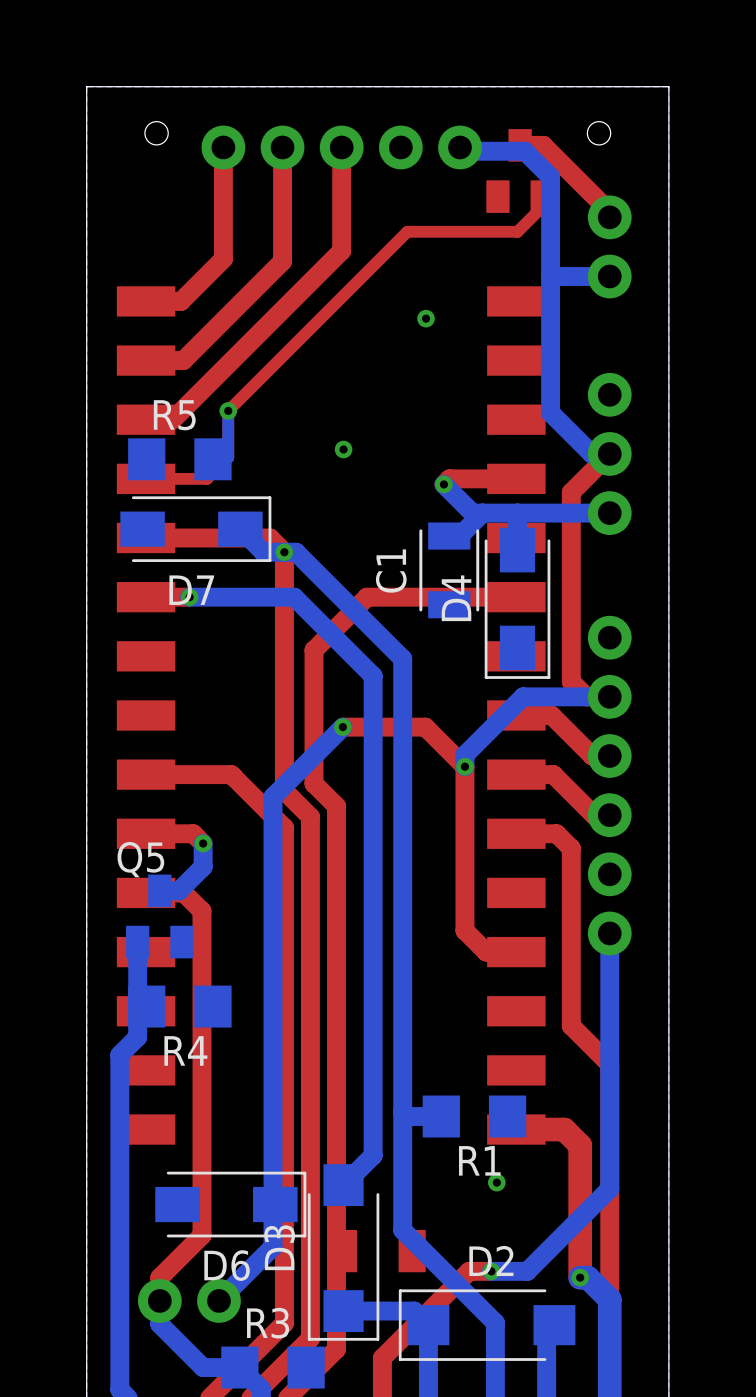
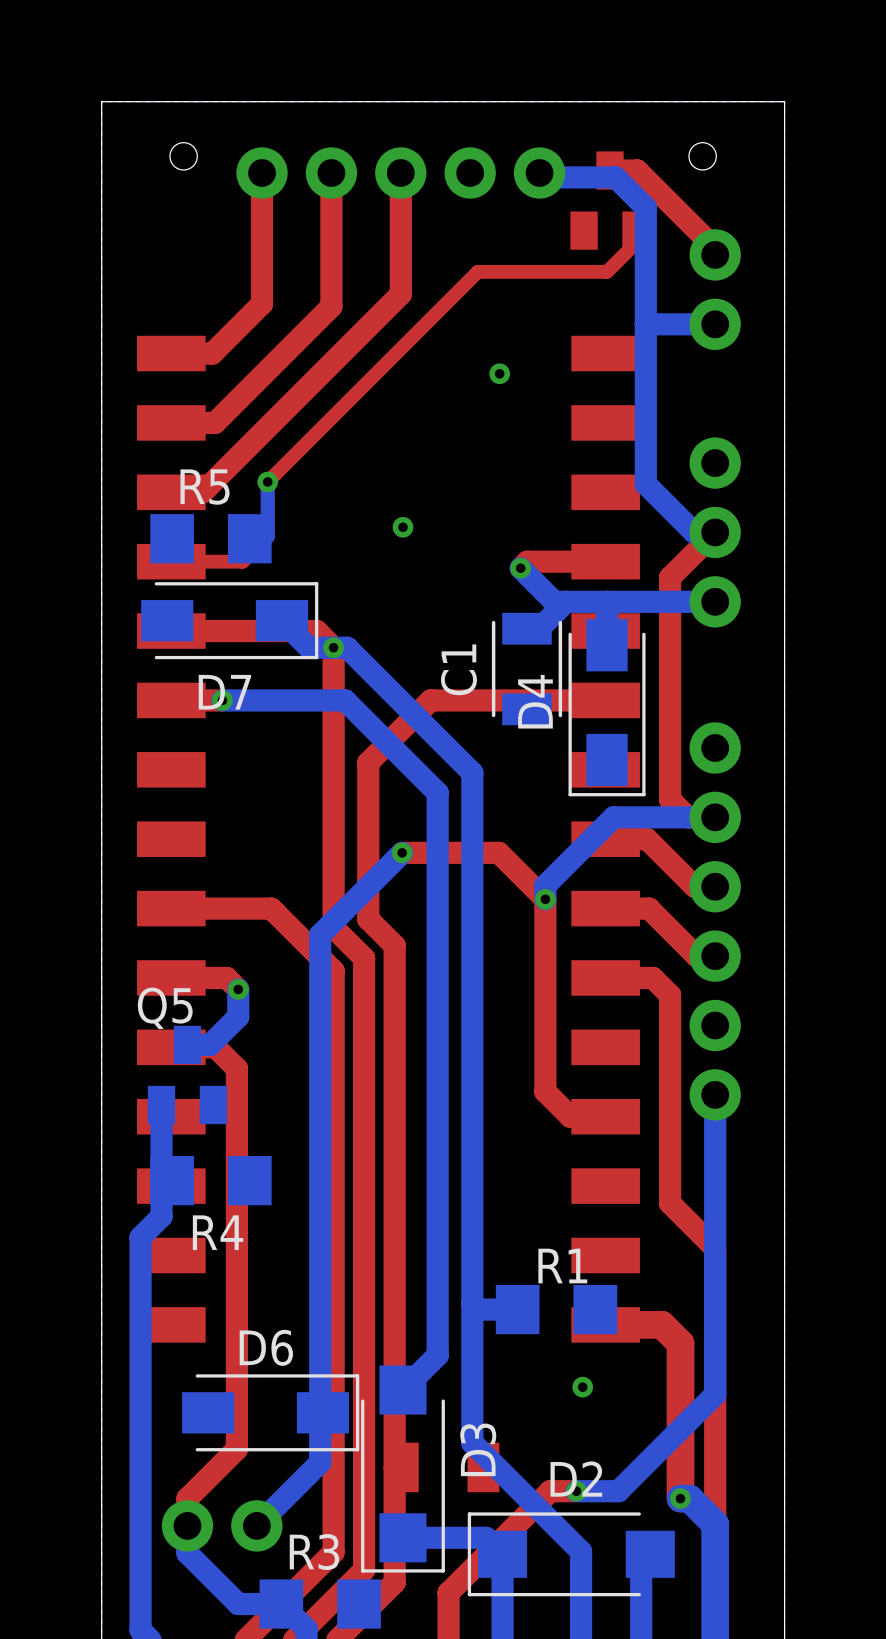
R1 name position: R1 (479, 1160) -> R1 (562, 1266)
D3 name position: D3 (279, 1247) -> D3 (478, 1449)
D6 name position: D6 (227, 1265) -> D6 (266, 1347)

